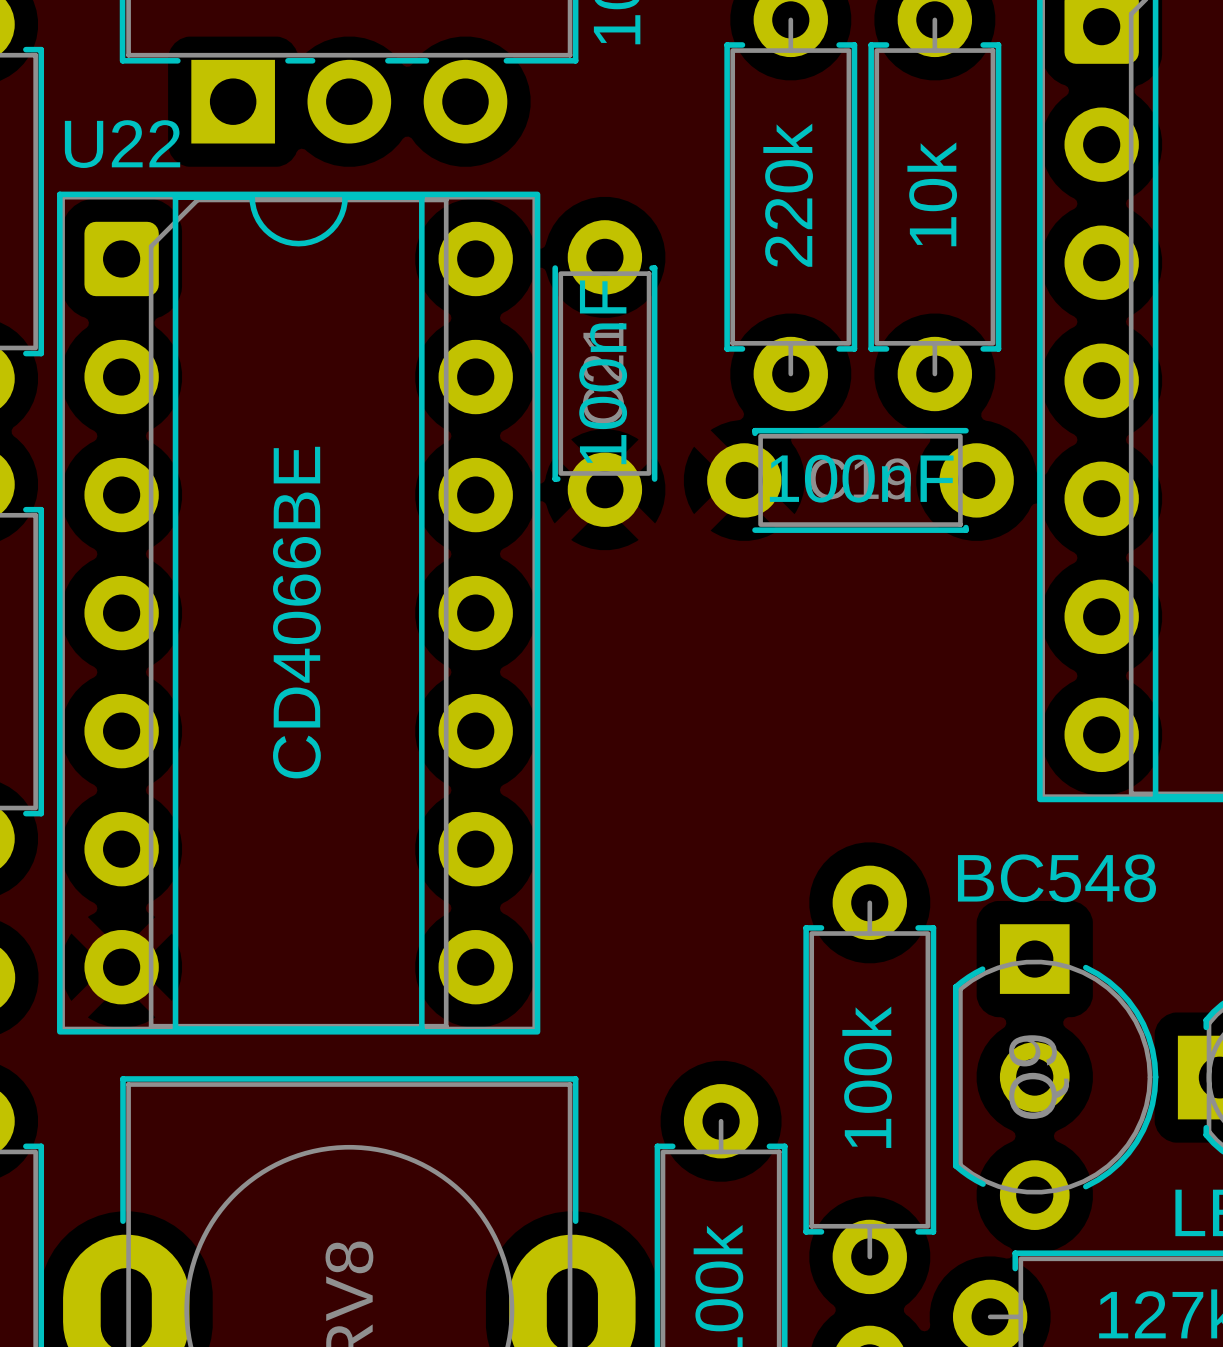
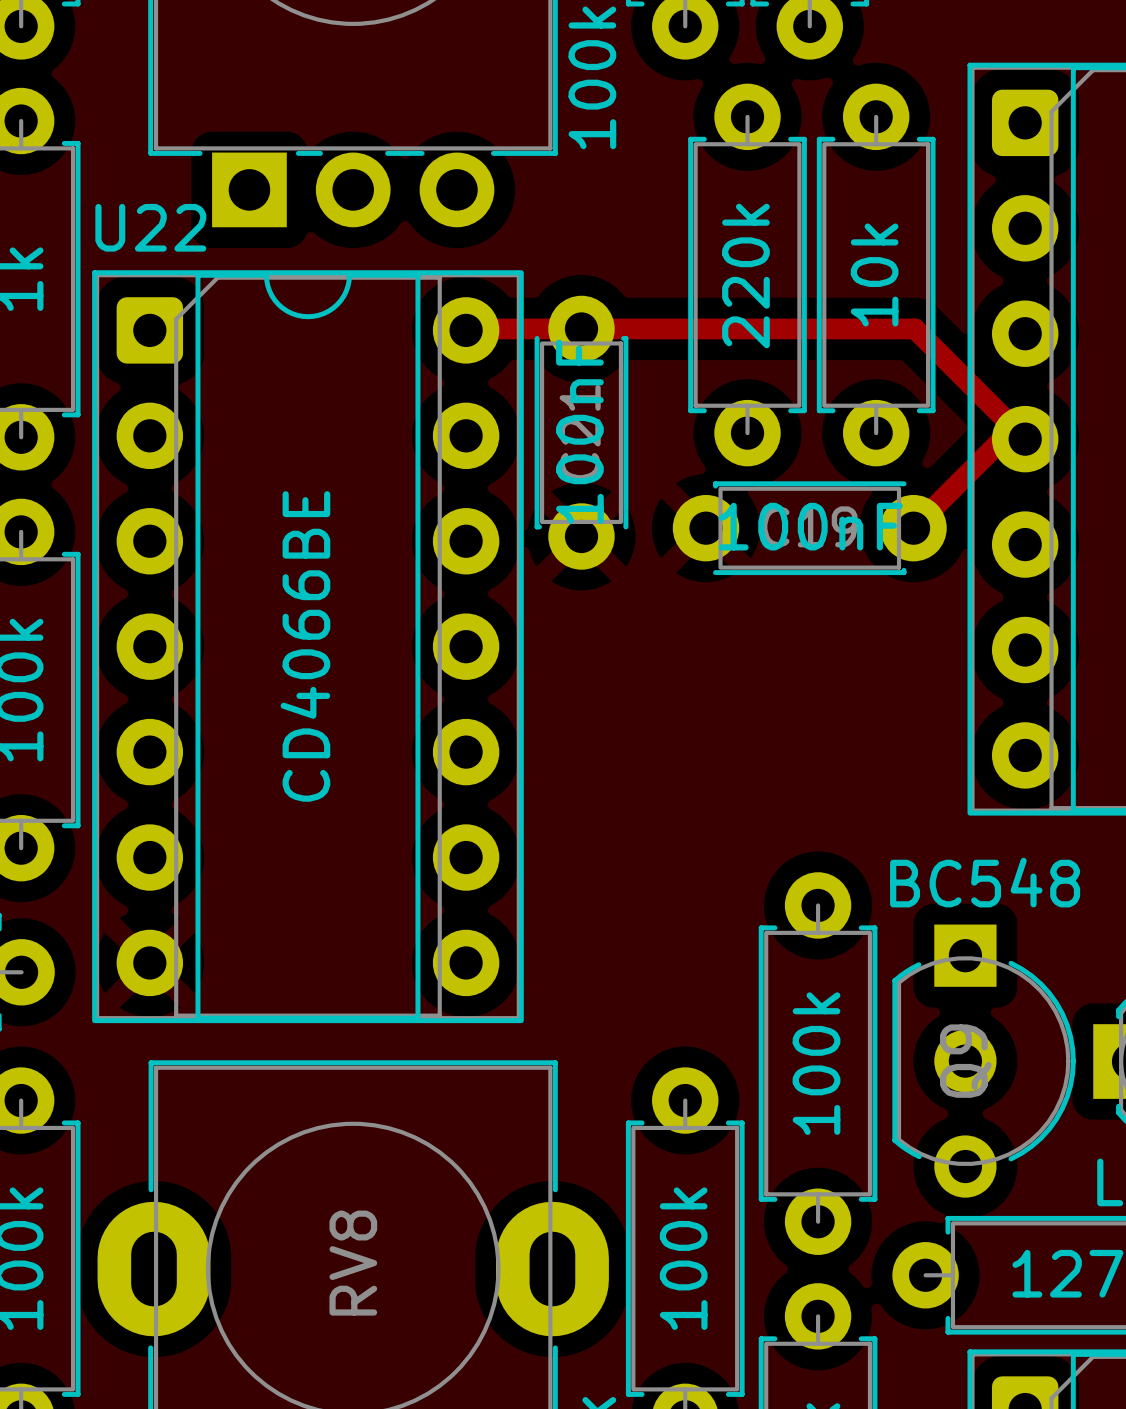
track: none -> (466, 330) (914, 328) (1025, 439) (1002, 439) (913, 528)

